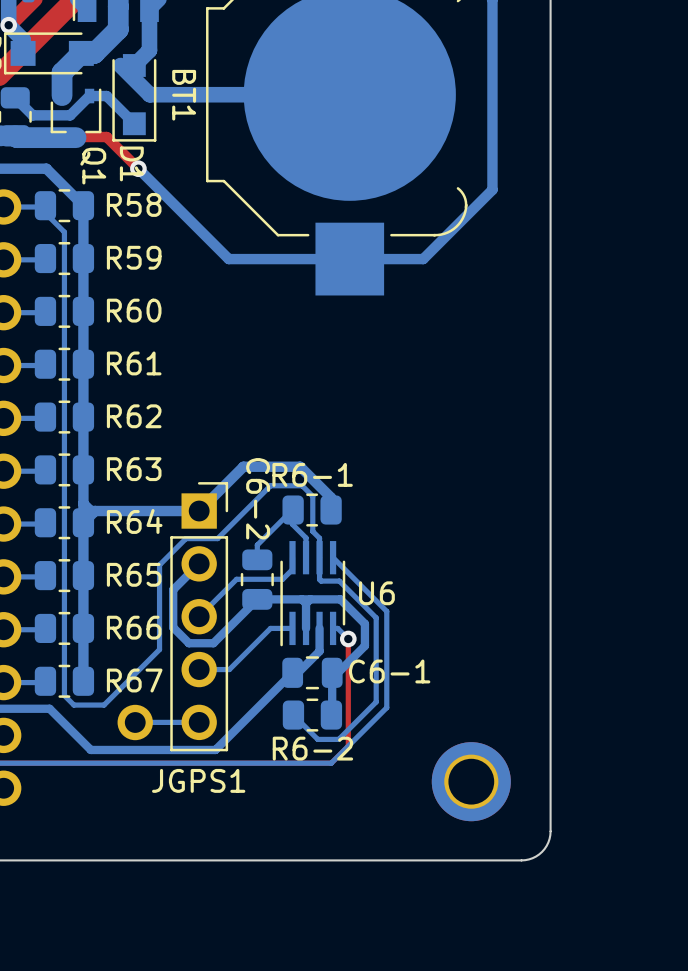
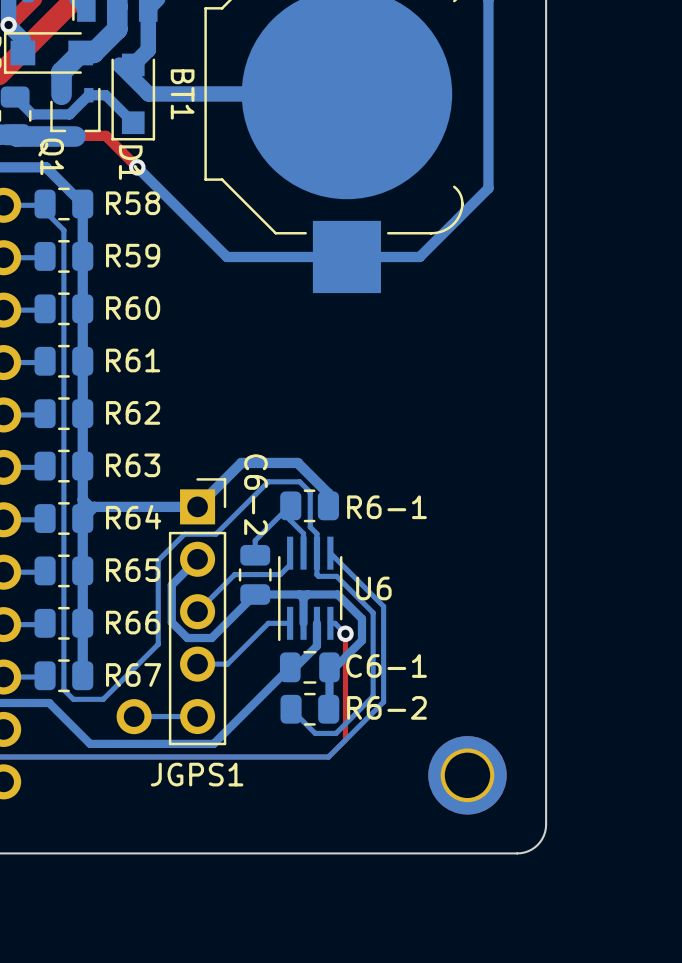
Q1 name position: Q1 (93, 166) -> Q1 (51, 156)
R6-1 name position: R6-1 (312, 474) -> R6-1 (386, 507)
R6-2 name position: R6-2 (312, 748) -> R6-2 (386, 707)

